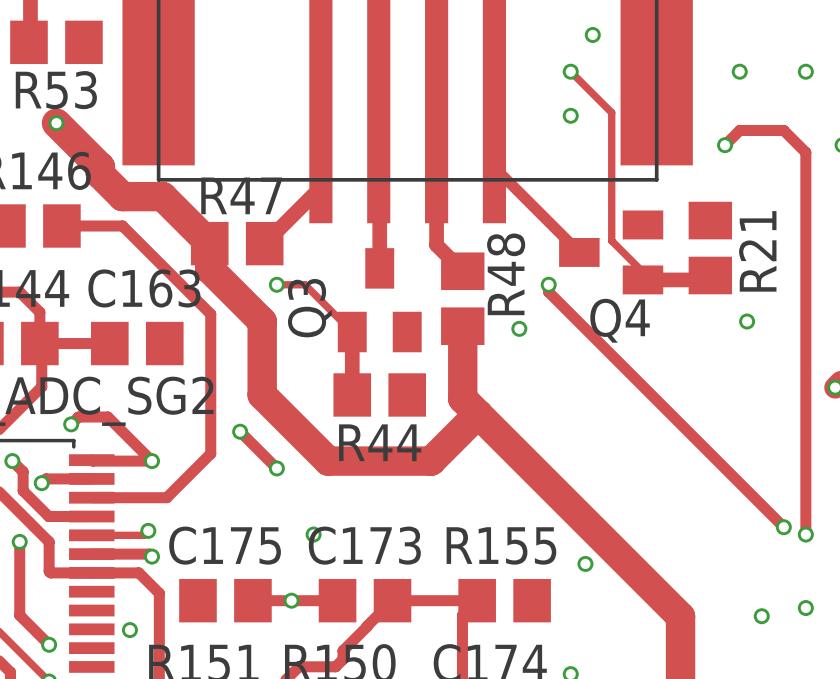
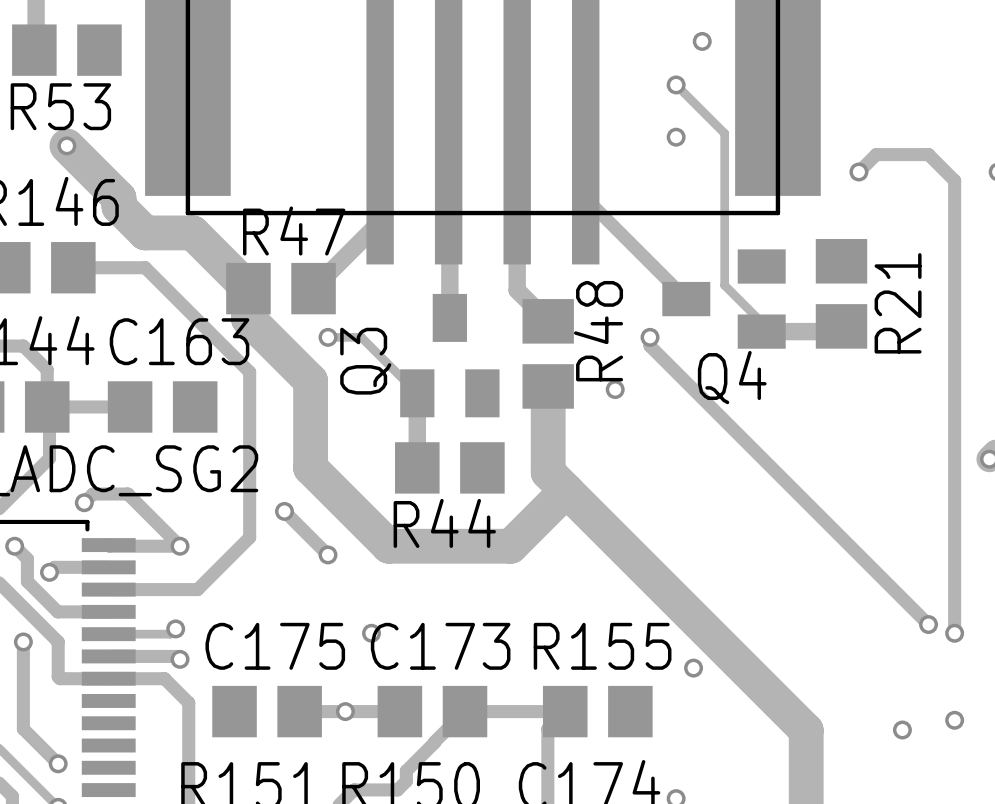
via: (739, 71) -> none
via: (805, 71) -> none
via: (747, 321) -> none
via: (129, 630) -> none

